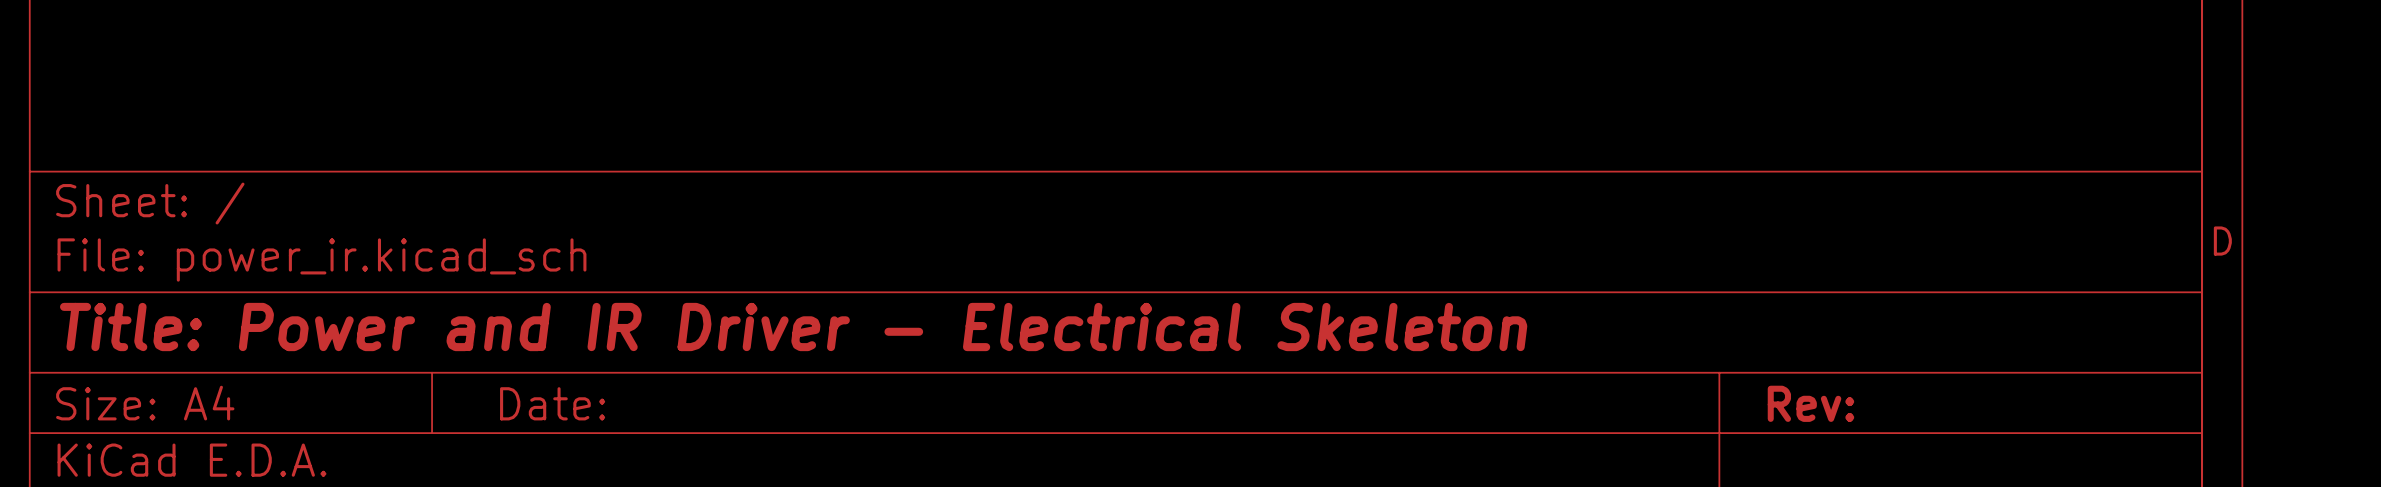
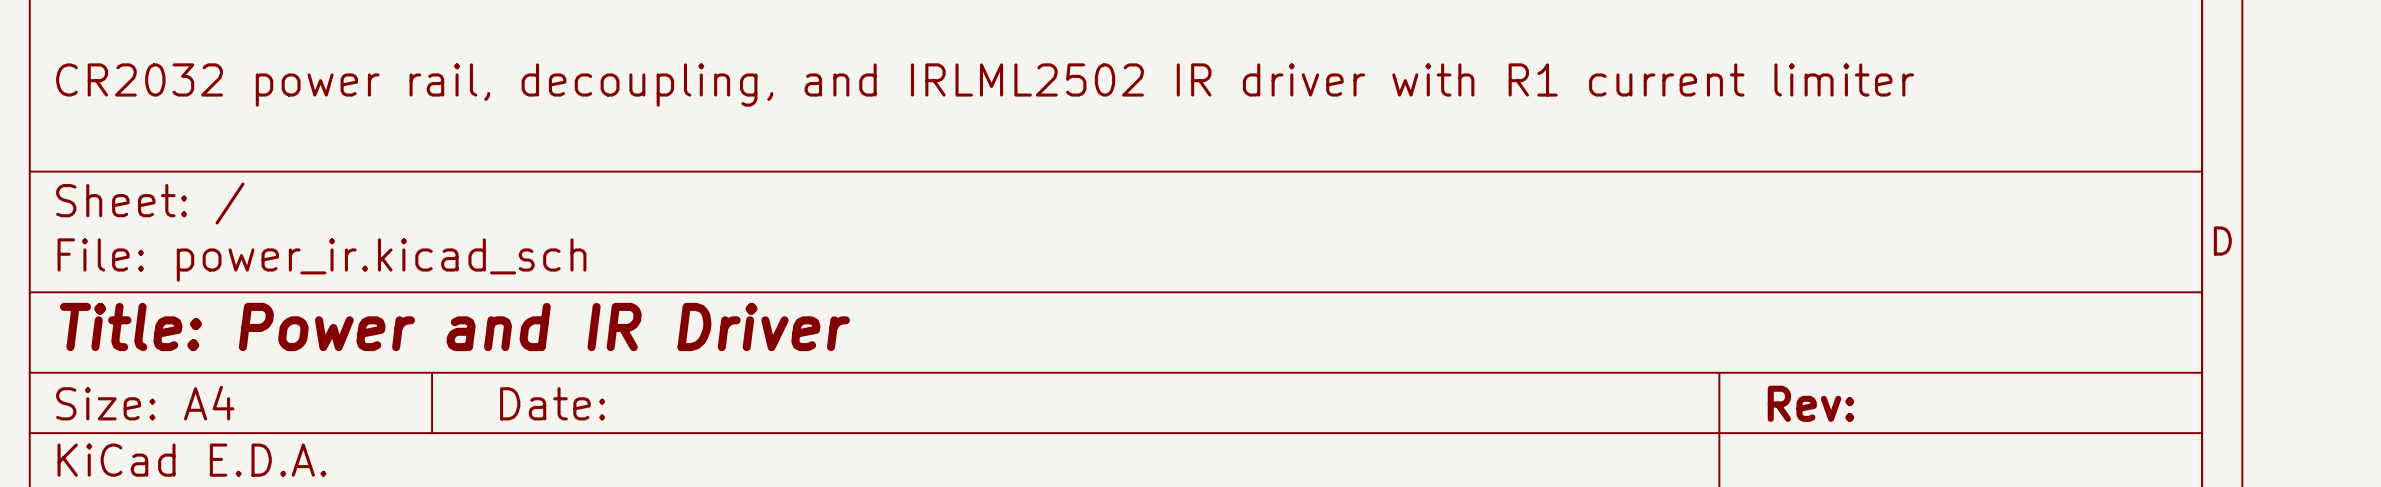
title block: none -> CR2032 power rail, decoupling, and IRLML2502 IR driver with R1 current limiter (985, 85)
title block: Title: Power and IR Driver - Electrical Skeleton (793, 327) -> Title: Power and IR Driver (454, 327)

